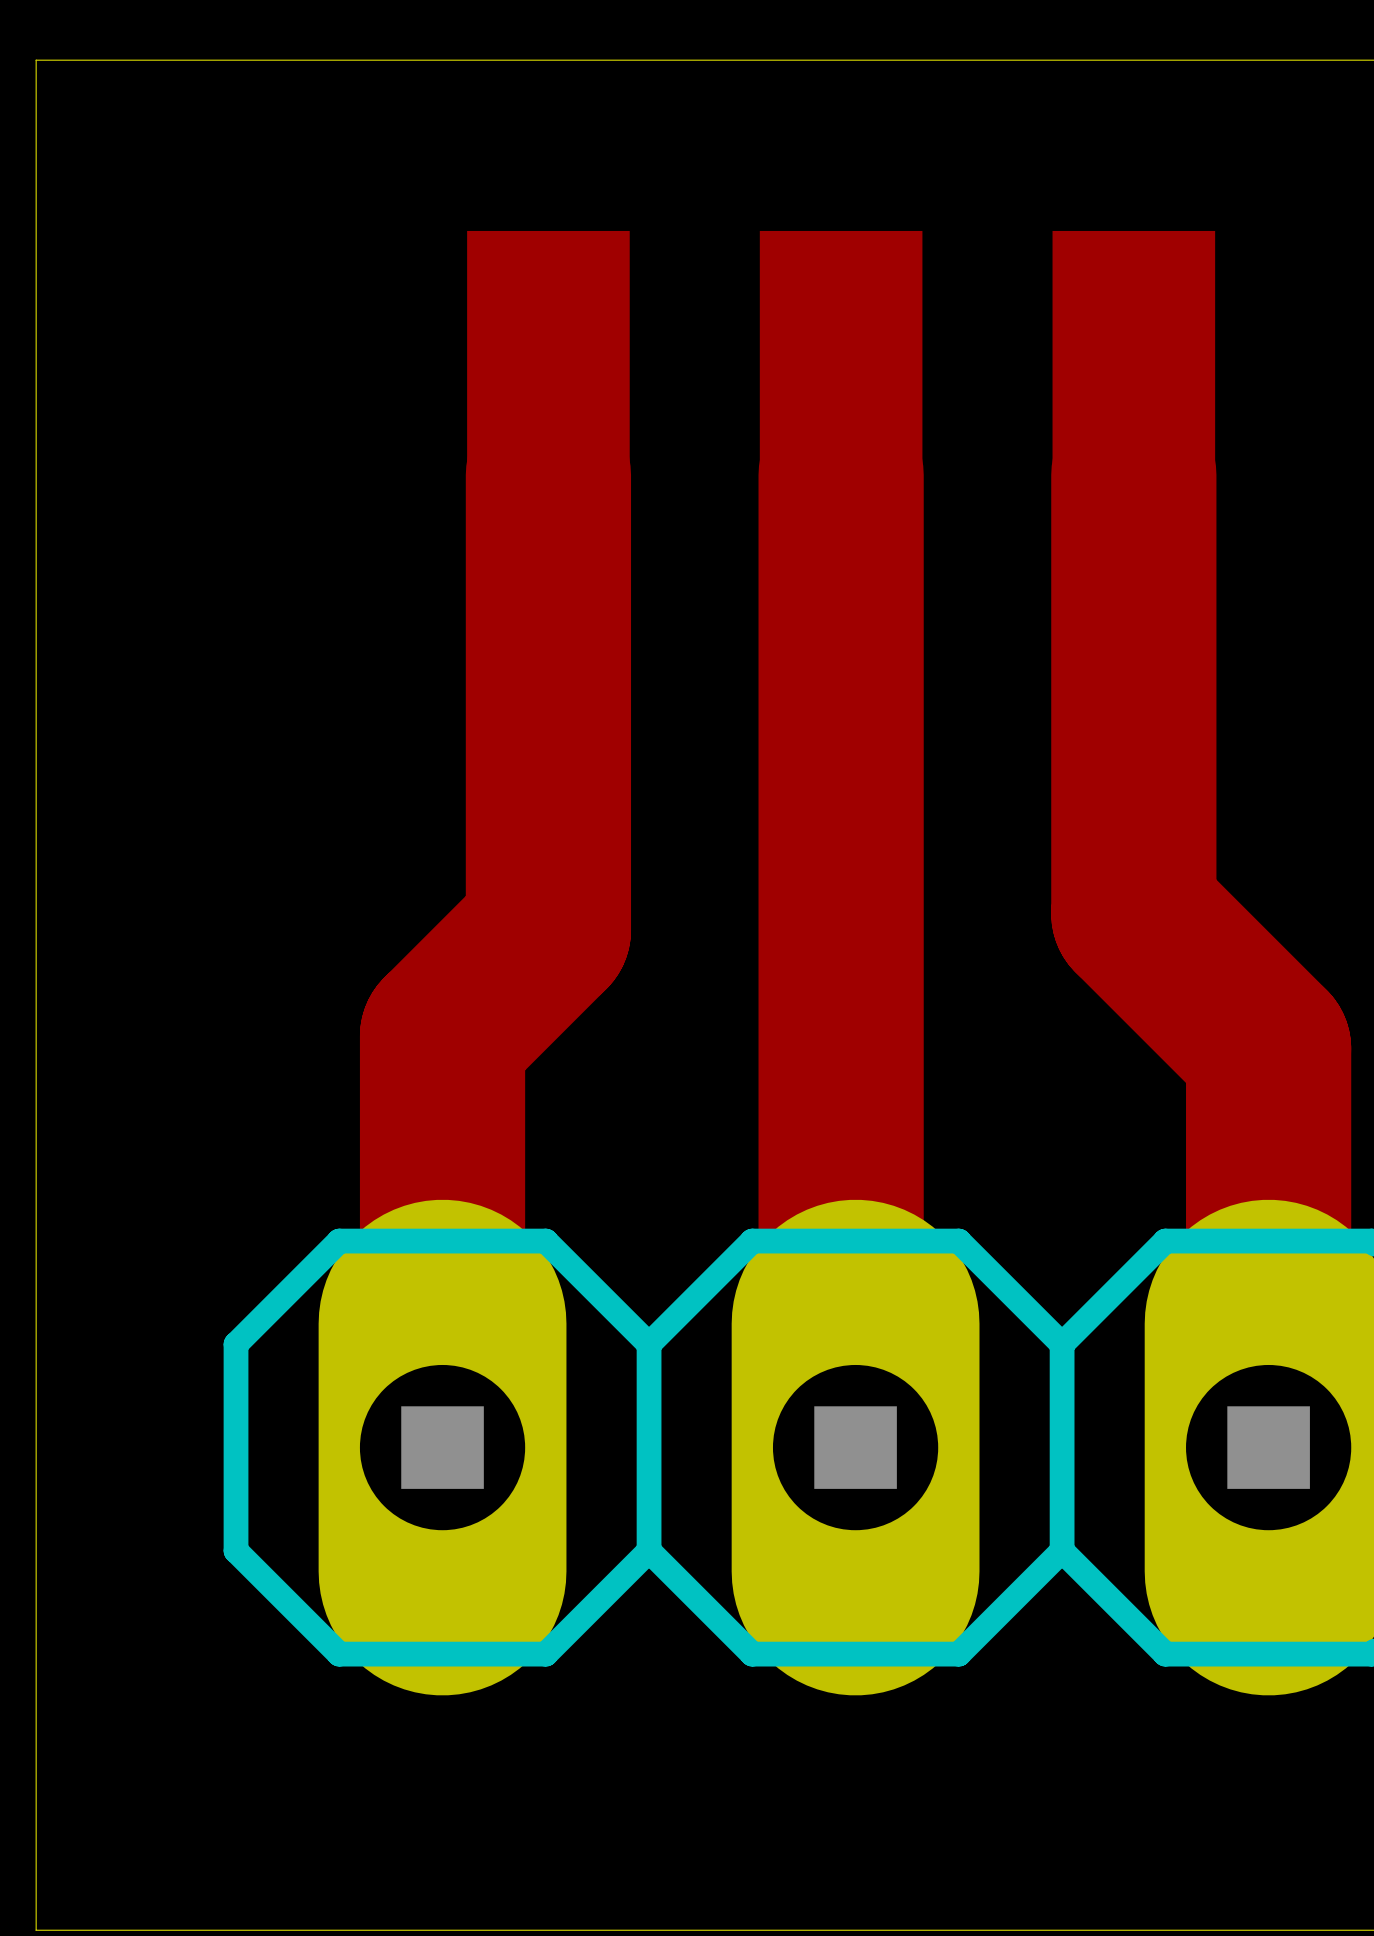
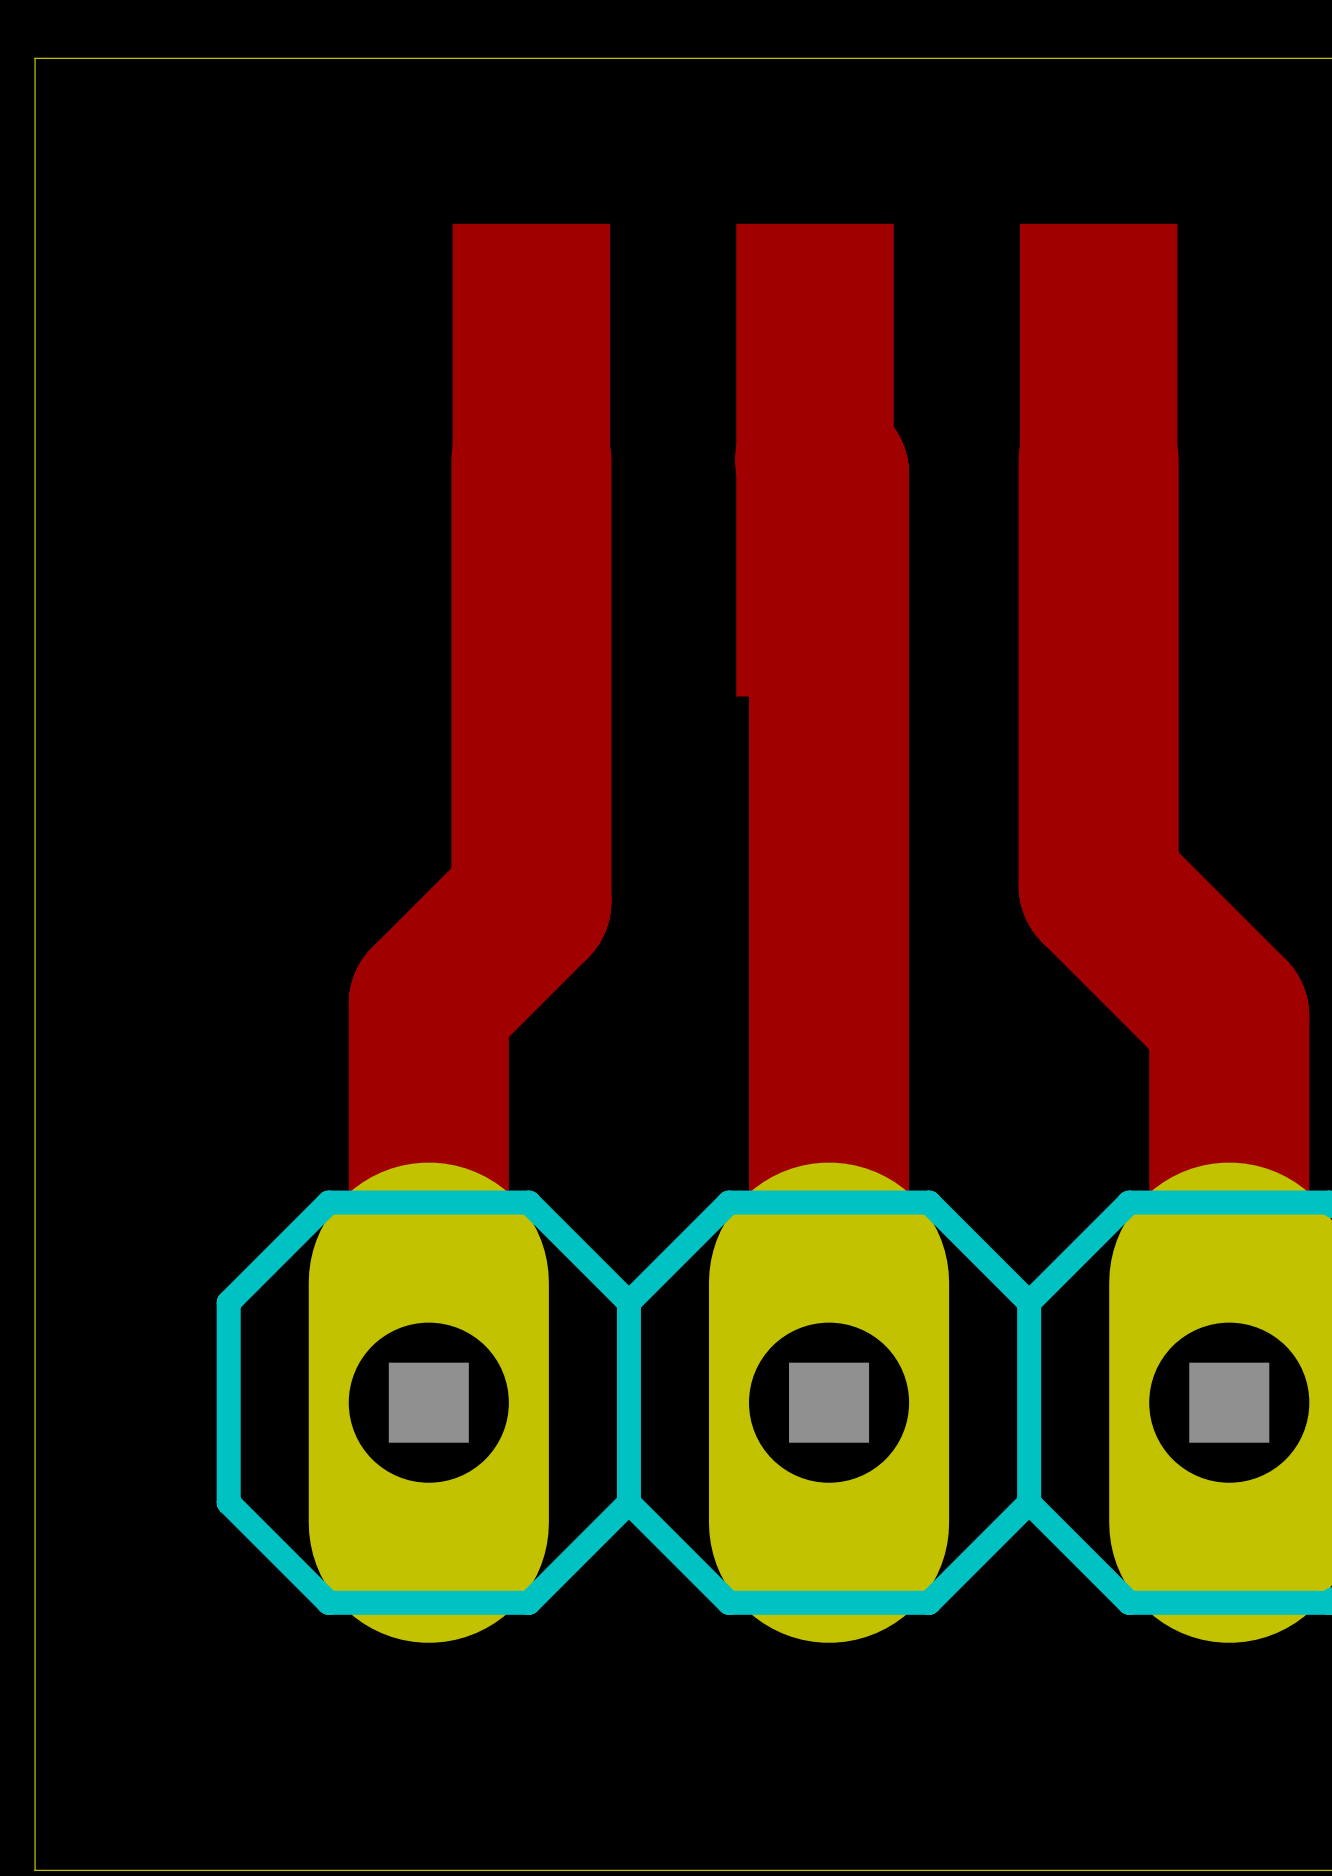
track: (841, 474) (841, 1433) (855, 1447) -> (815, 460) (829, 474) (829, 1402)

